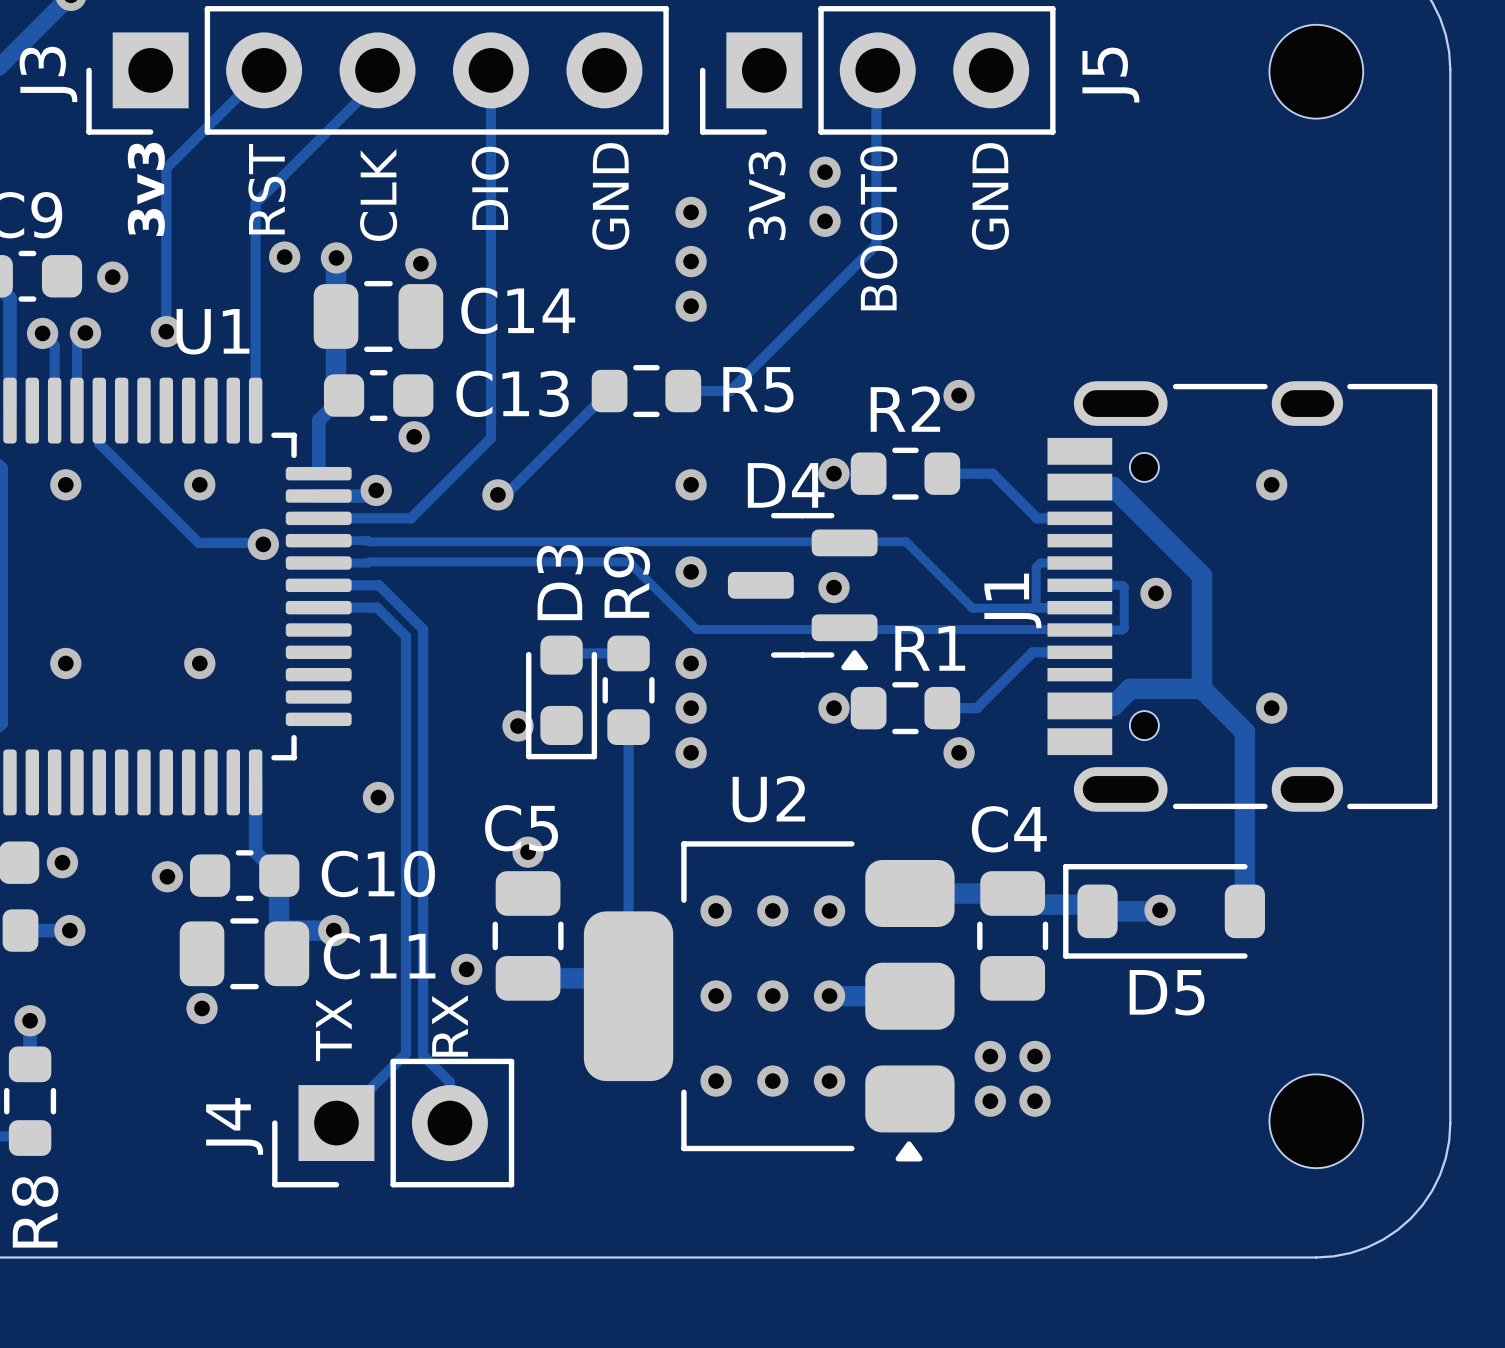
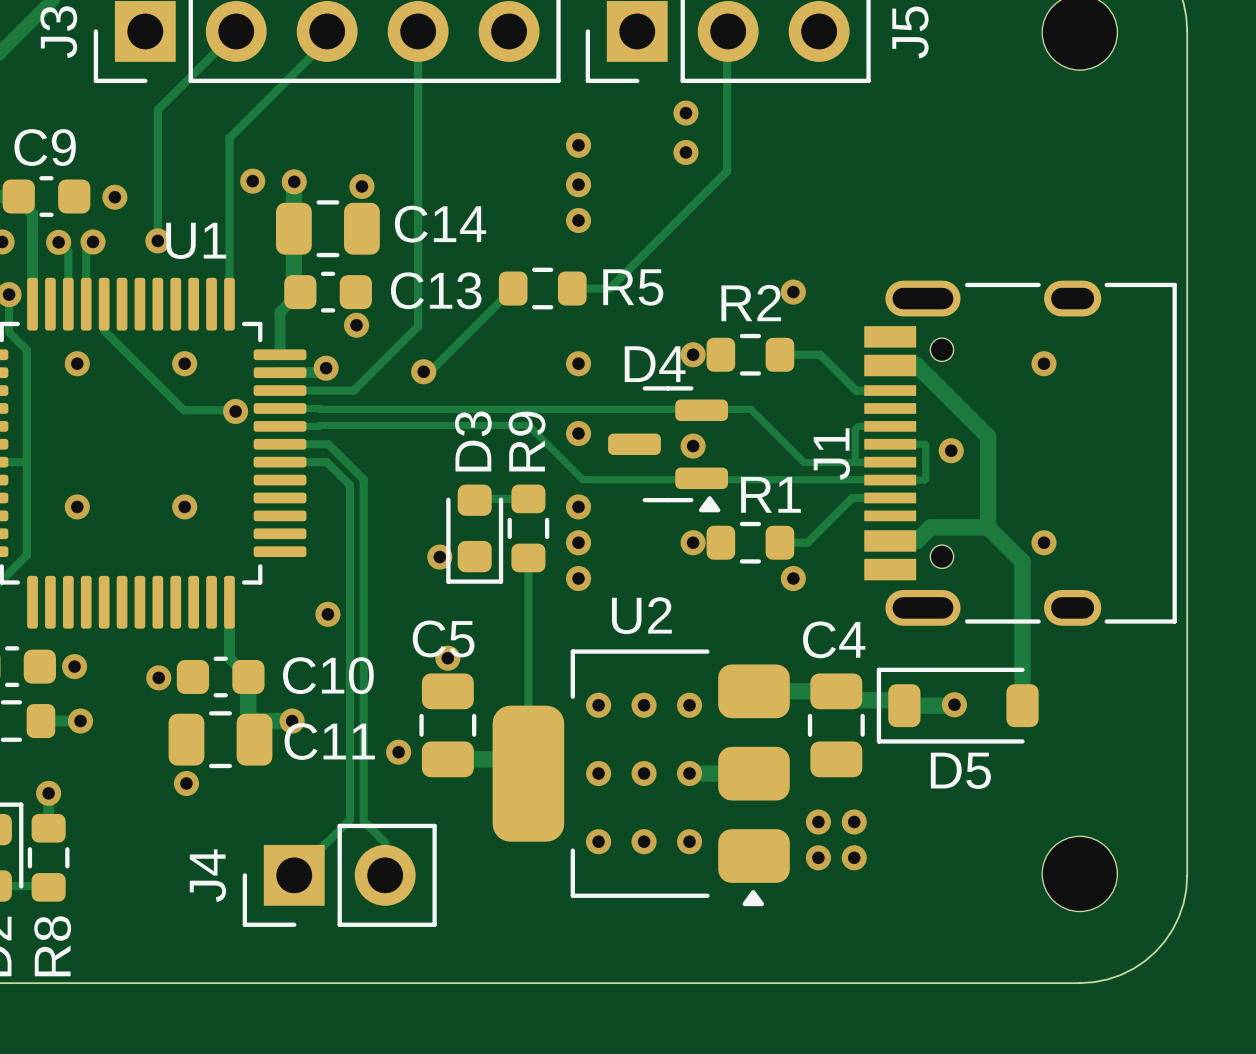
text: DIO (490, 188) -> none
text: 3v3 (146, 189) -> none
text: RST (266, 189) -> none
text: CLK (378, 194) -> none
text: 3V3 (767, 195) -> none
text: GND (610, 196) -> none
text: GND (990, 196) -> none
text: BOOT0 (878, 228) -> none
text: RX (450, 1025) -> none
text: TX (333, 1030) -> none

